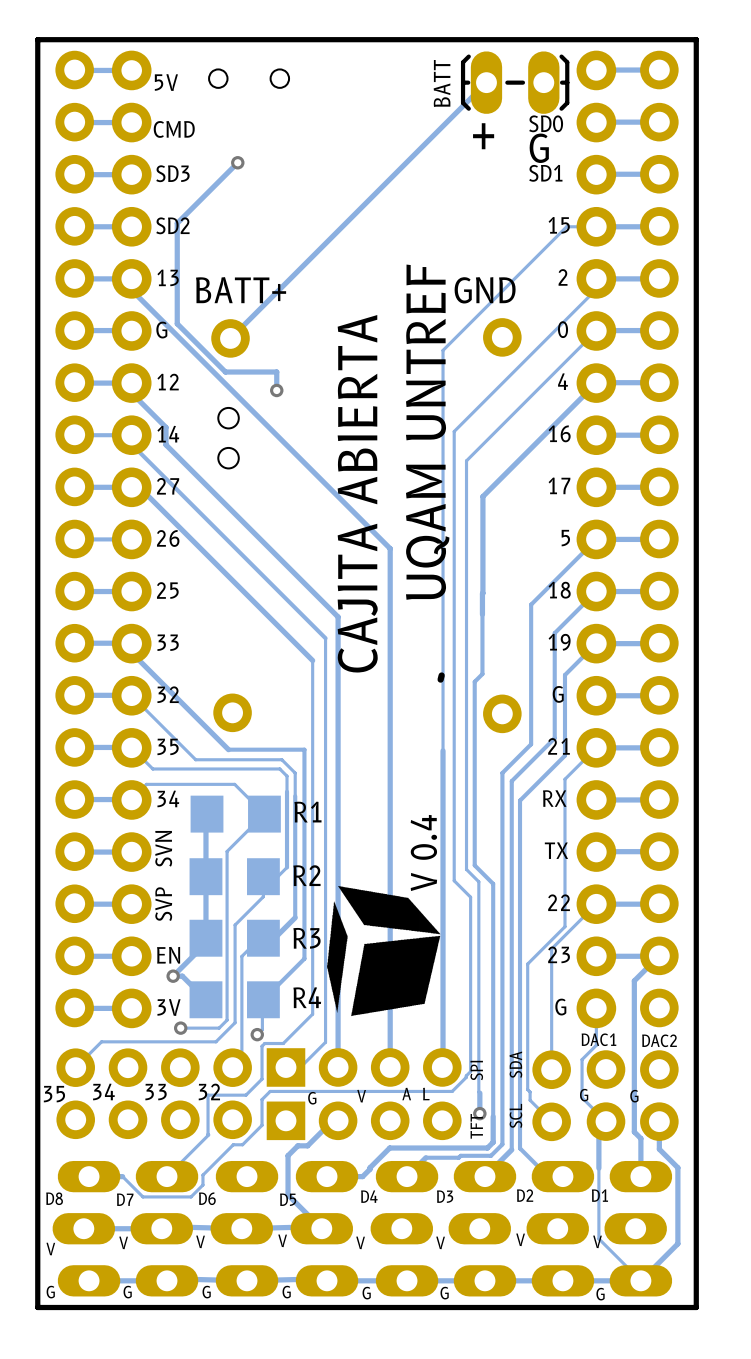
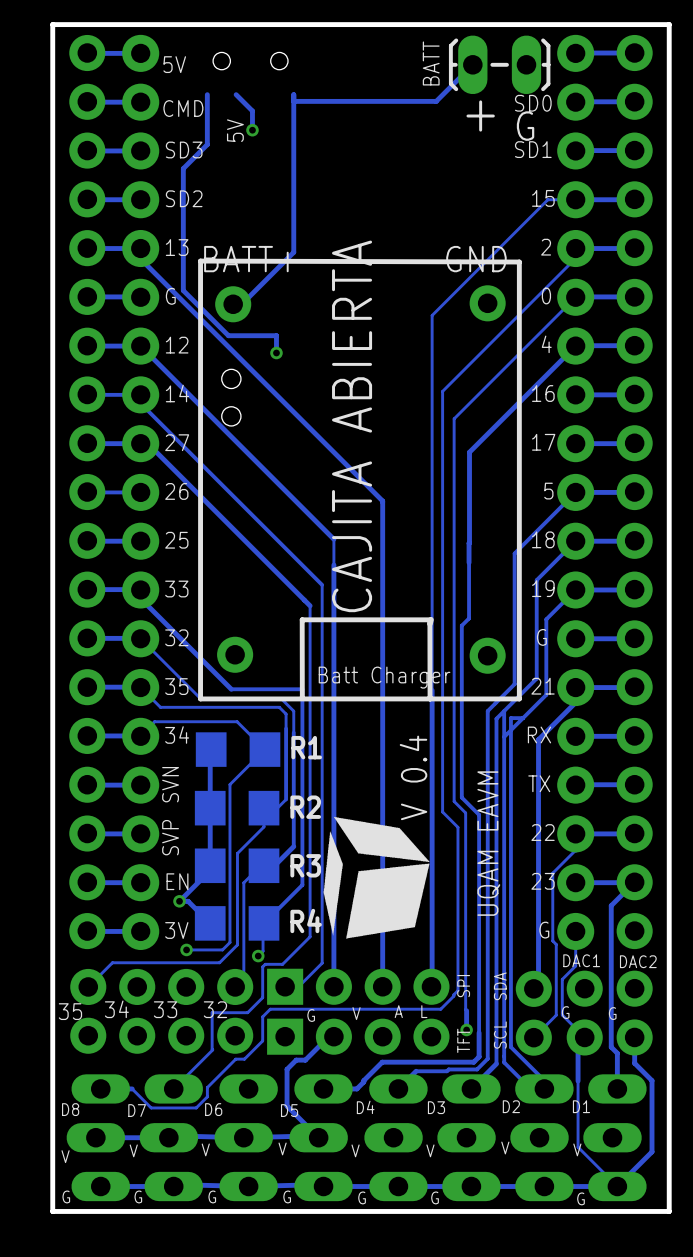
track: none -> (236, 94) (252, 111) (252, 130)
track: none -> (293, 94) (293, 252) (237, 308)
track: (447, 121) (230, 338) -> (436, 101) (293, 101)
text: none -> 5V (235, 130)
track: (237, 162) (177, 223) -> (207, 94) (207, 144) (183, 168) (183, 196)
via position: (237, 162) -> (252, 130)
line: none -> (200, 261) (519, 262) (519, 698) (200, 698) (200, 261)
track: (131, 383) (131, 393) (165, 427) (165, 444) (338, 616) -> (140, 346) (333, 539) (333, 565)
text: UQAM UNTREF (427, 432) -> none
line: none -> (430, 619) (302, 619) (302, 697)
line: none -> (429, 623) (430, 698)
part value: none -> Batt Charger (384, 677)
track: (596, 747) (564, 779) (564, 926) (527, 964) (527, 1089) (530, 1092) (530, 1100) (551, 1121) -> (575, 687) (575, 702) (538, 739) (538, 984) (533, 988)
track: none -> (523, 718) (510, 718) (510, 1047) (544, 1080) (544, 1088)
track: (596, 904) (551, 948) (551, 1069) -> (575, 833) (575, 850) (552, 873) (552, 940) (556, 944) (556, 1015) (533, 1037)
text: none -> UQAM EAVM (488, 843)

